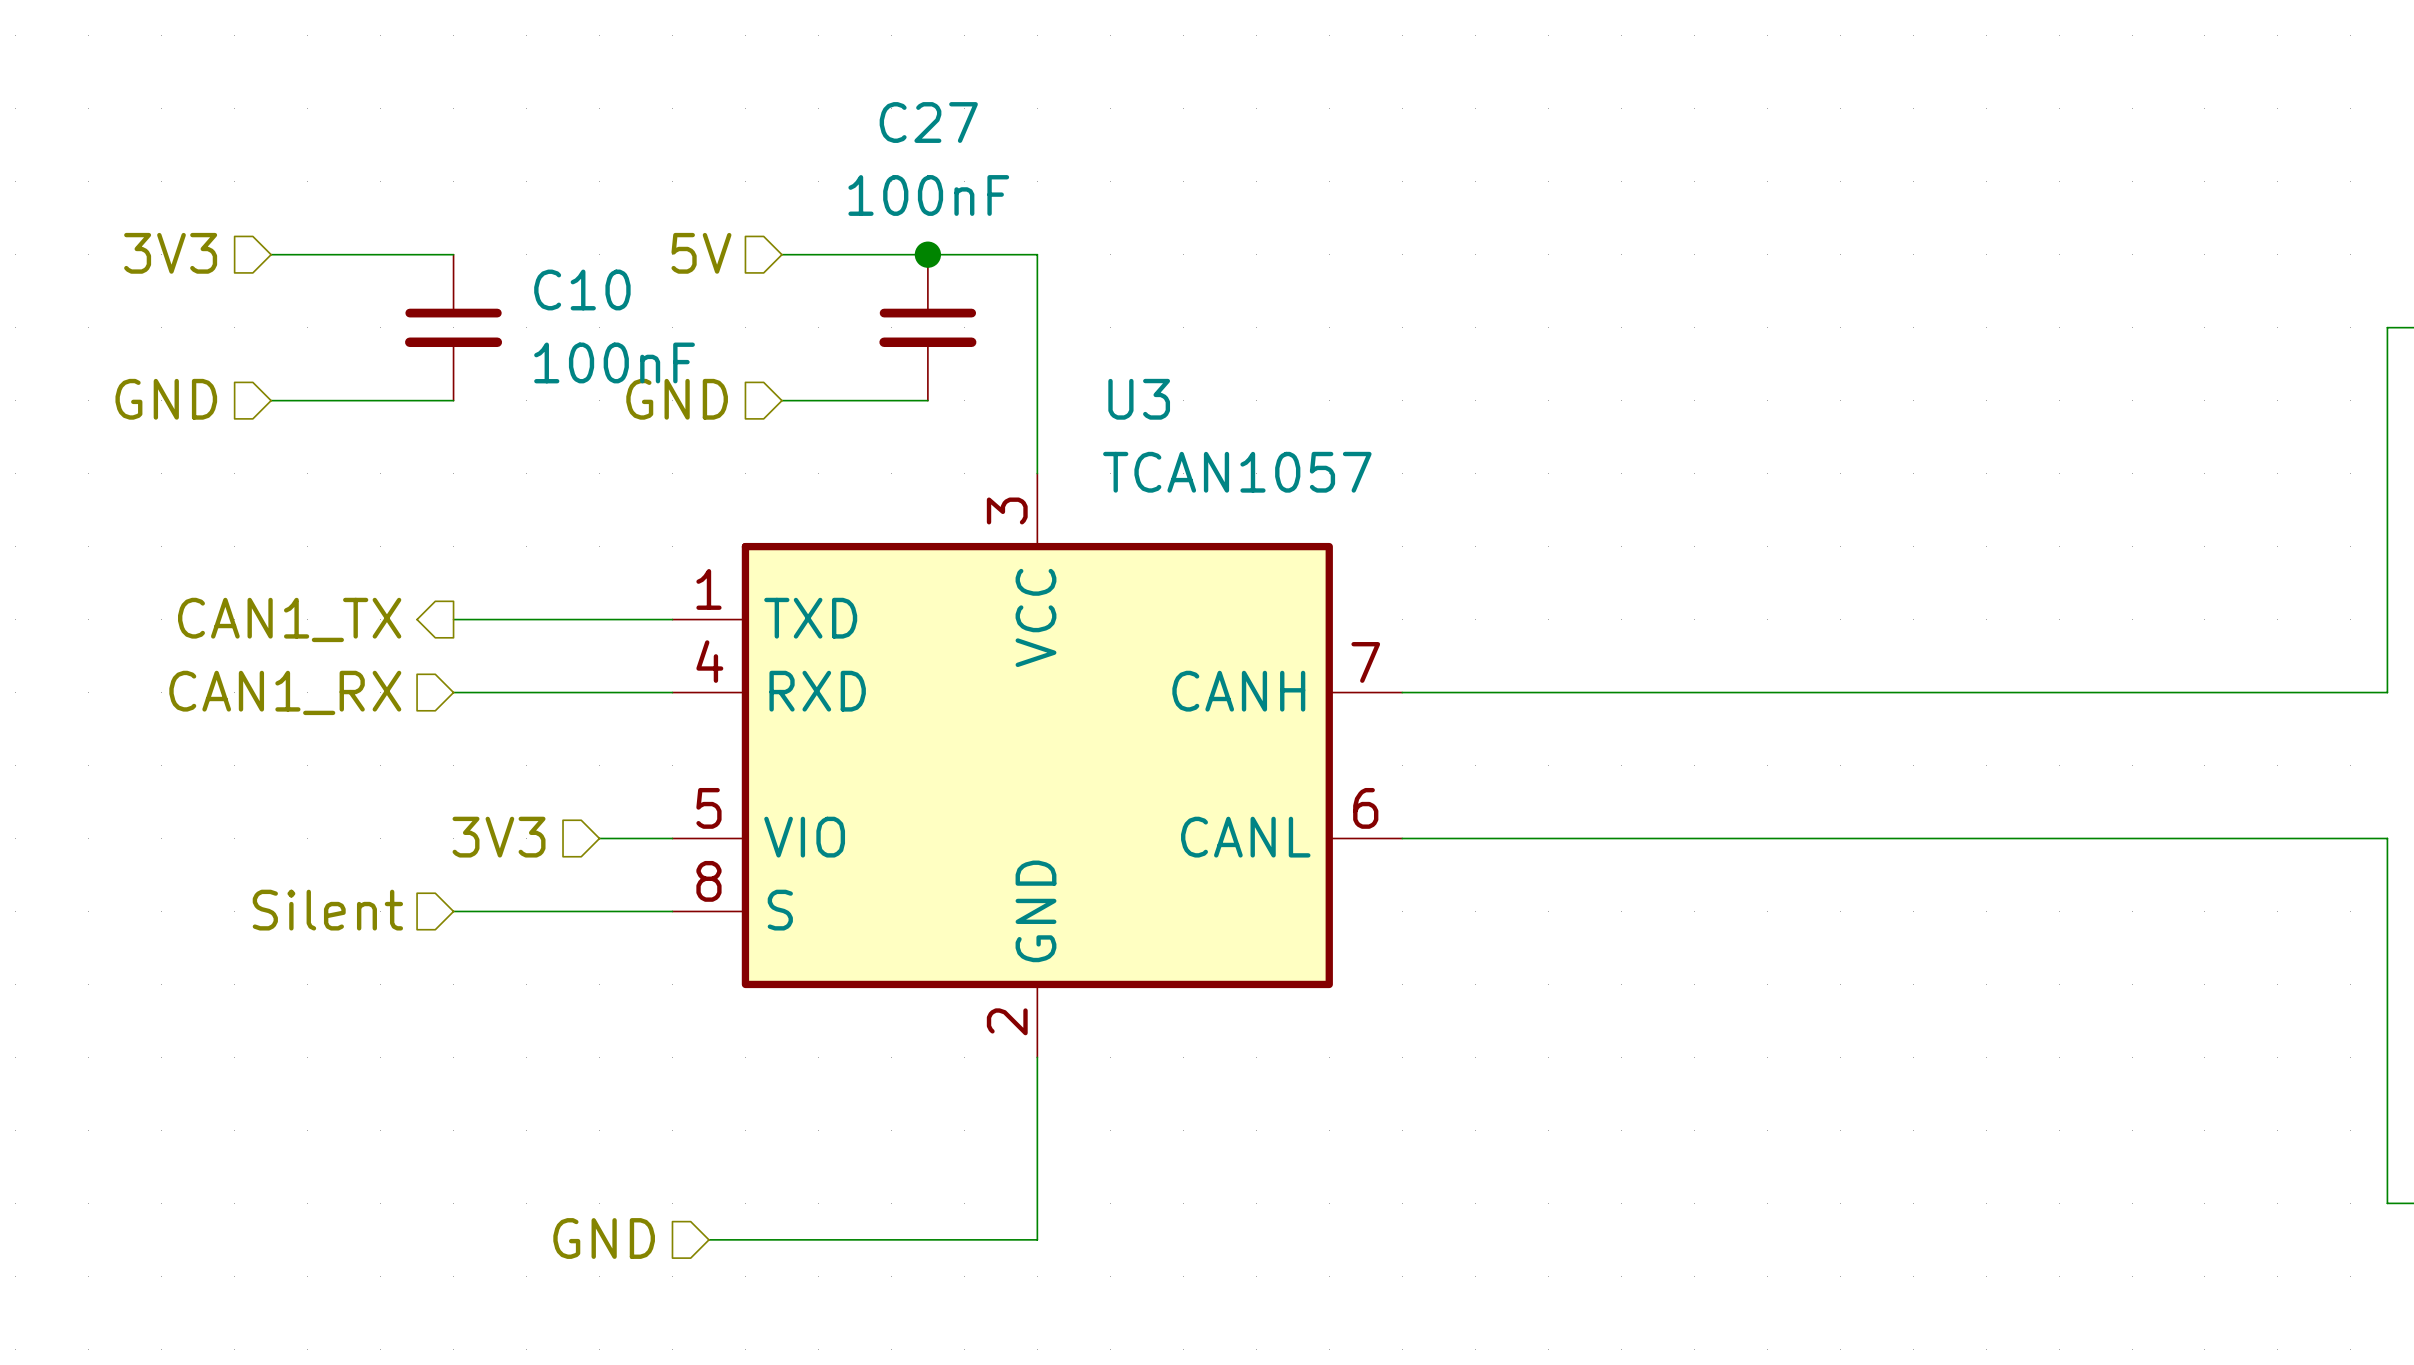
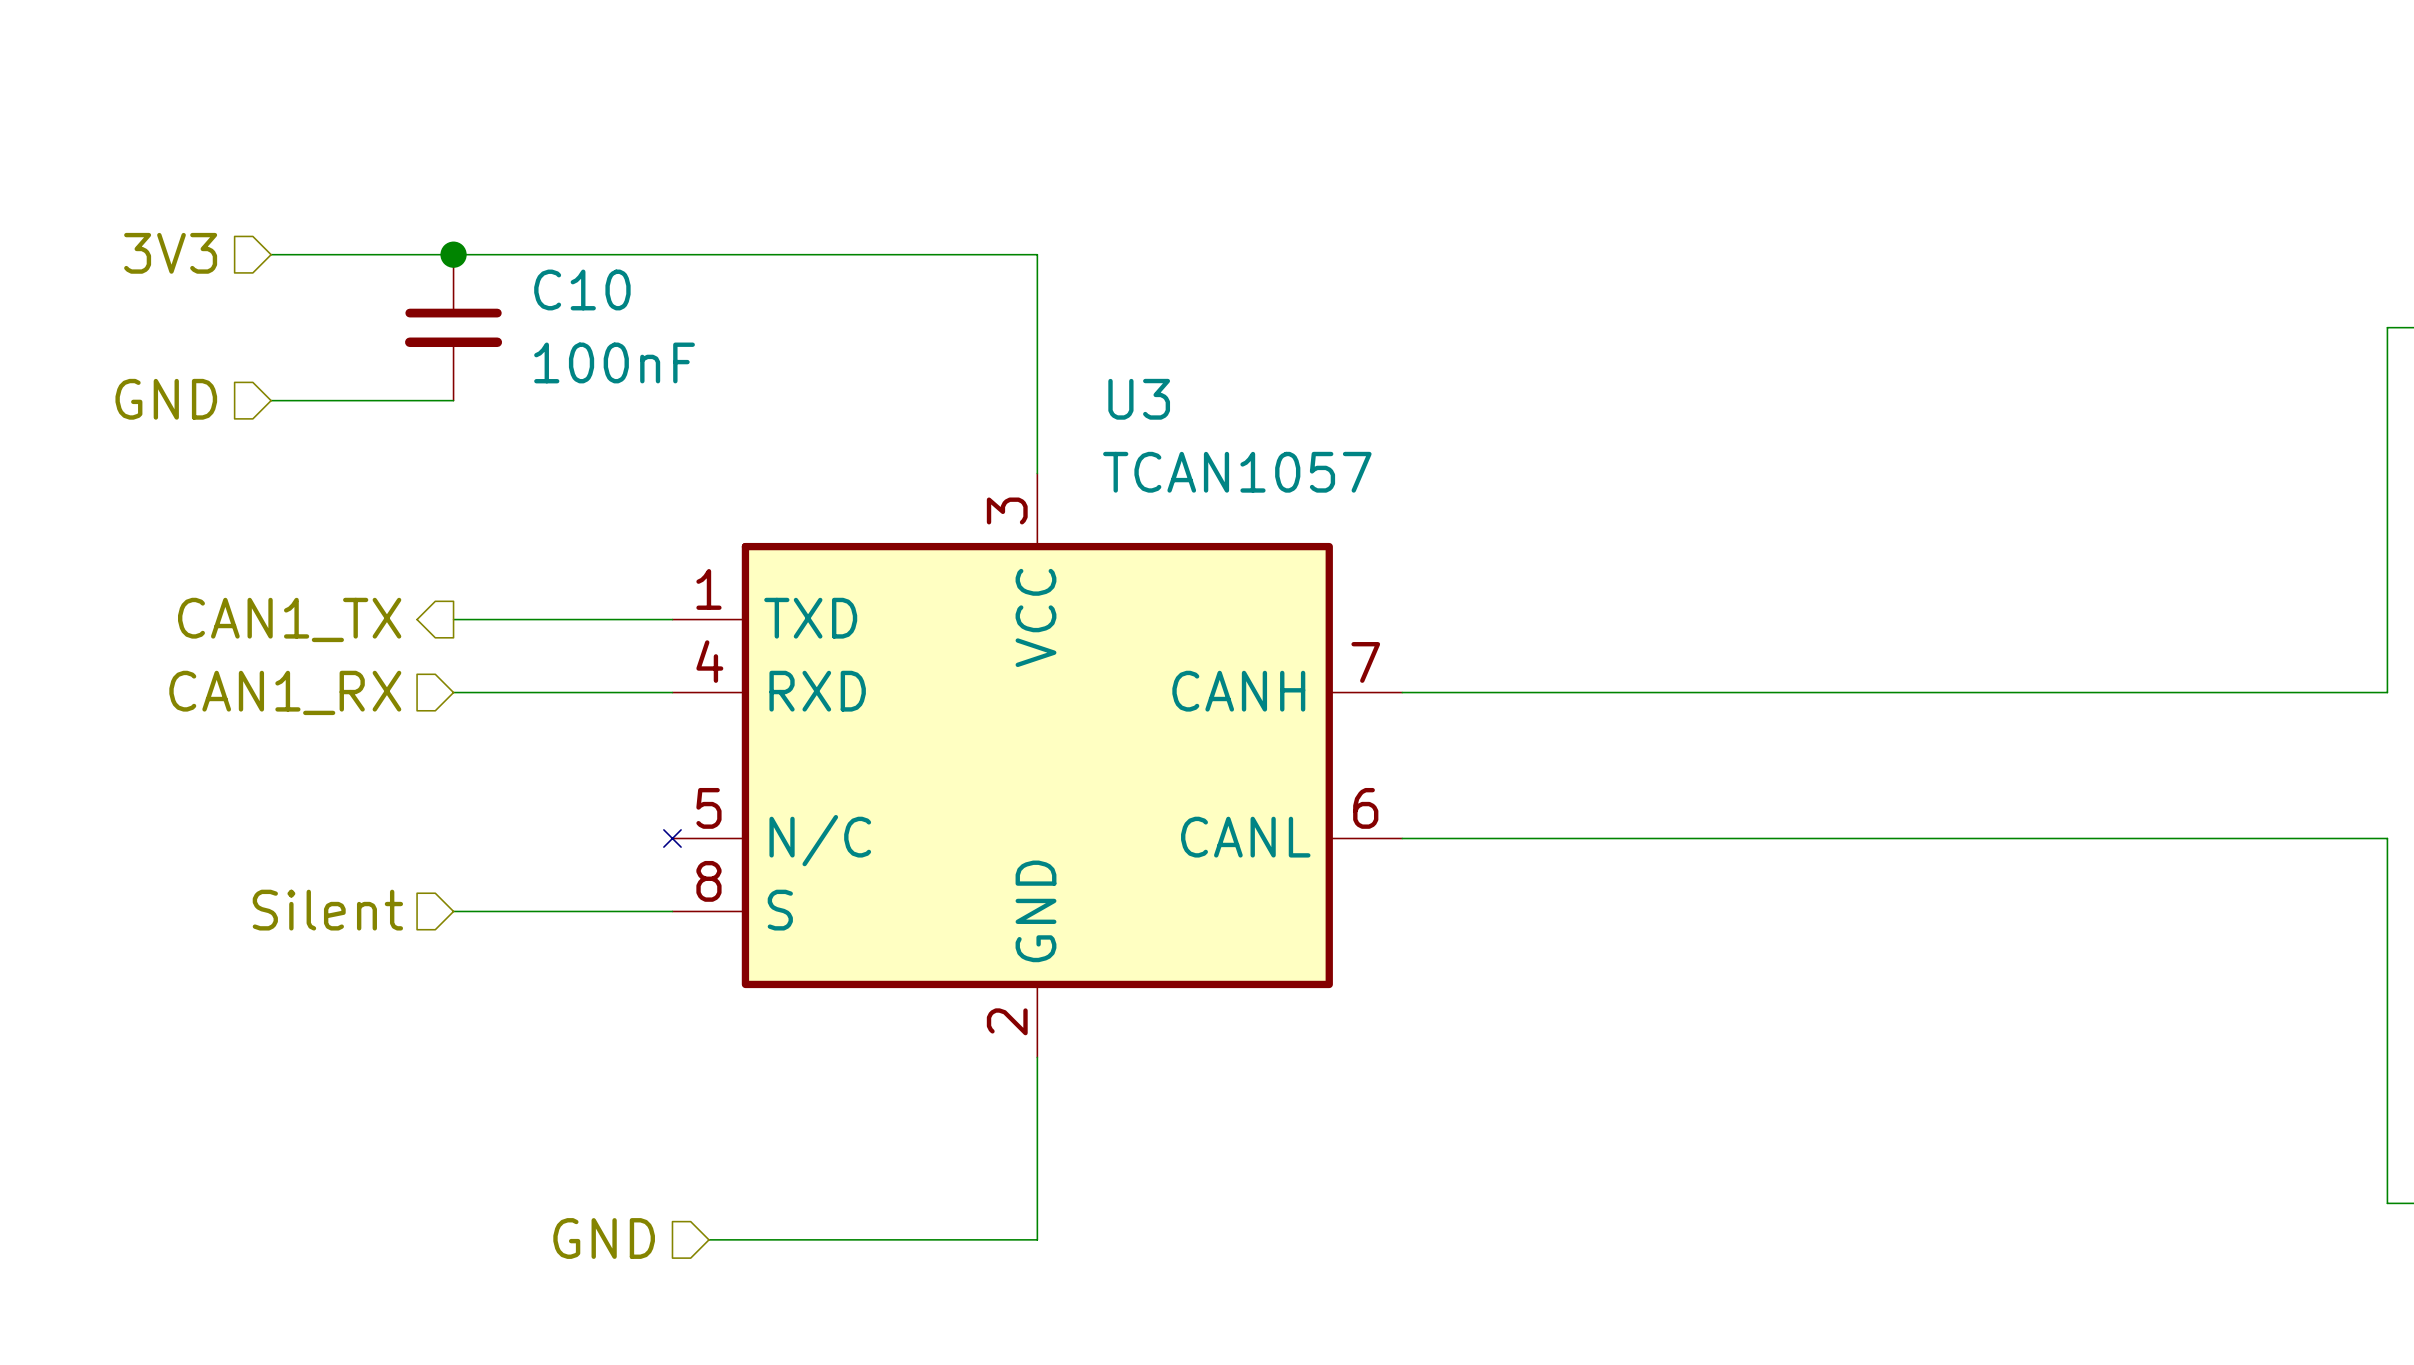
hierarchical label: 5V (701, 253) -> none
wire: none -> (453, 254) (781, 254)
junction: none -> (453, 254)
junction: (927, 254) -> none
C27: 100nF (927, 327) -> none
hierarchical label: GND (677, 399) -> none
wire: (781, 400) (927, 400) -> none
U3 symbol: [672, 473, 1403, 1058] -> [663, 473, 1403, 1058]
hierarchical label: 3V3 (499, 837) -> none
wire: (599, 838) (672, 838) -> none

